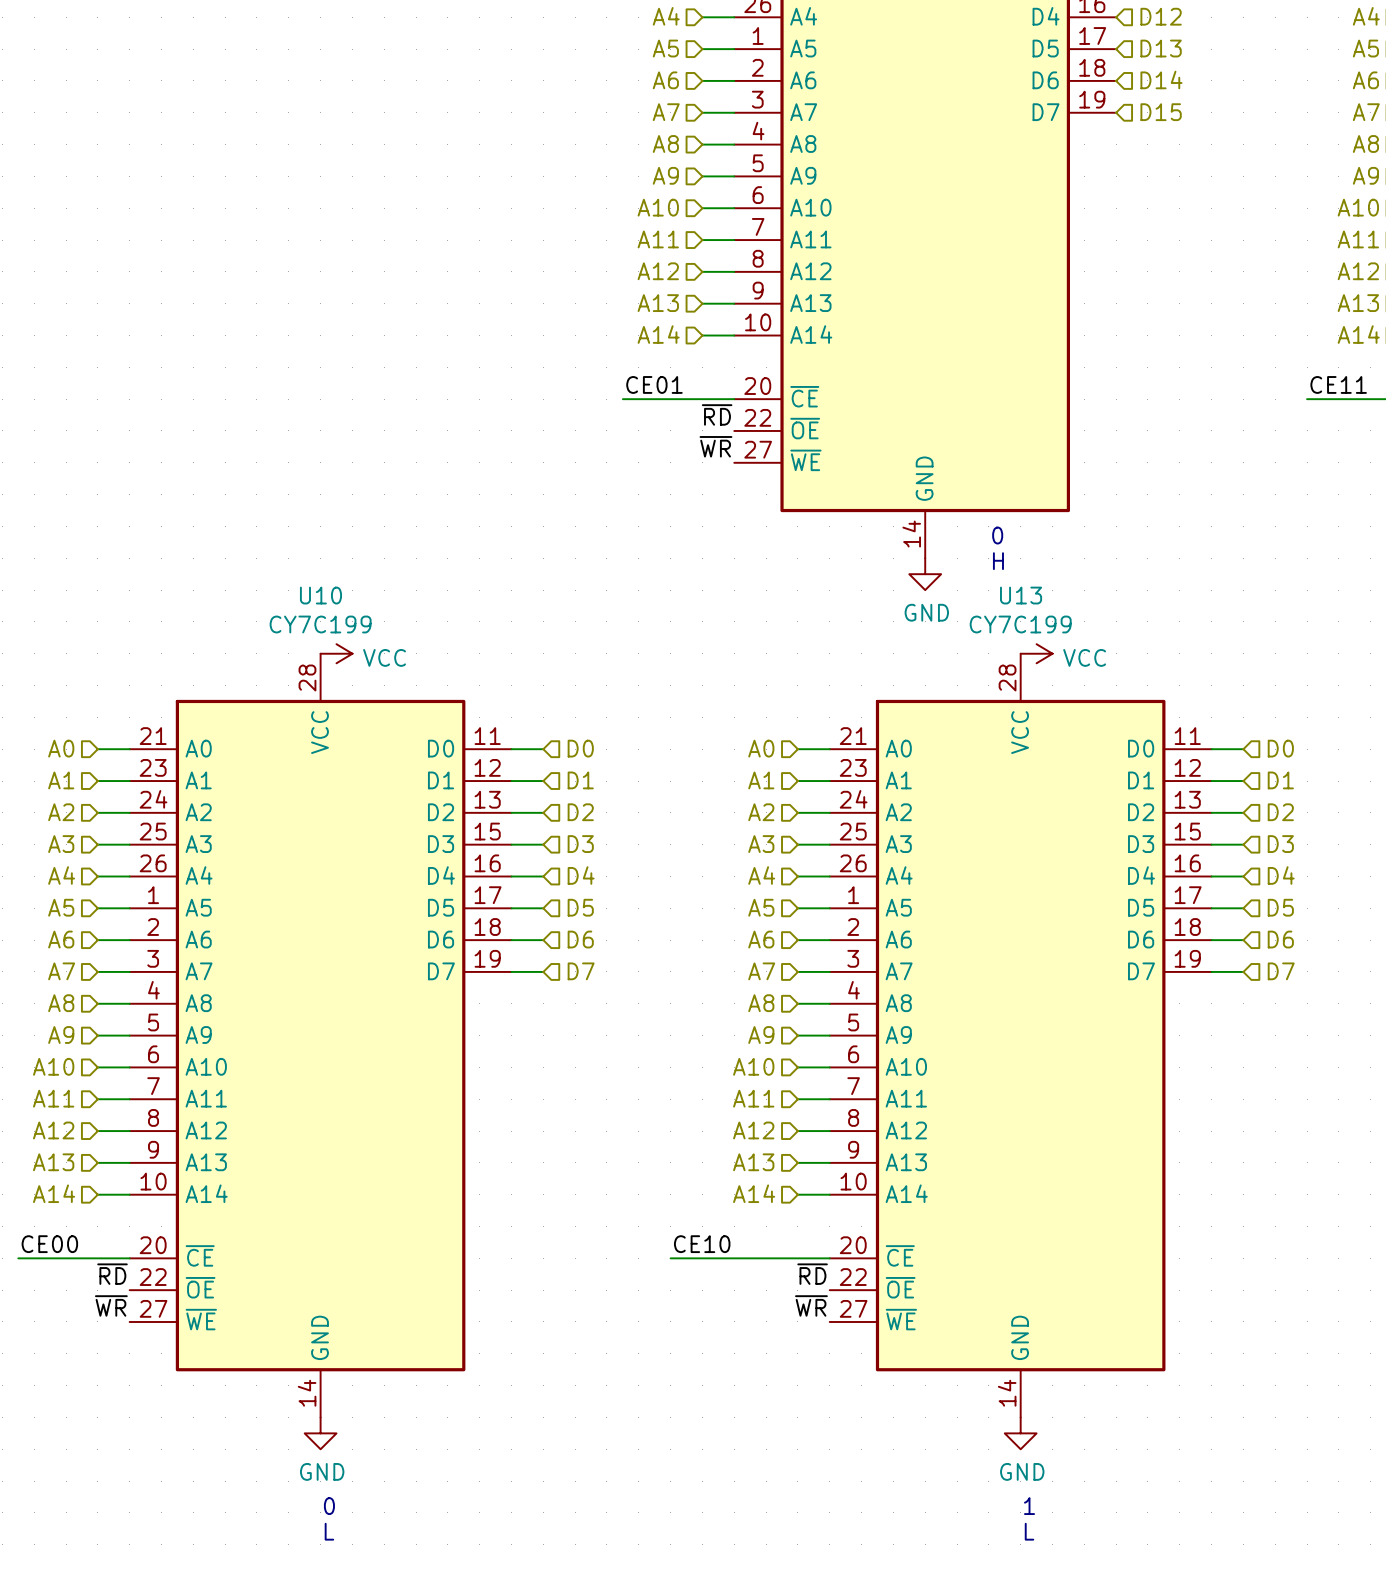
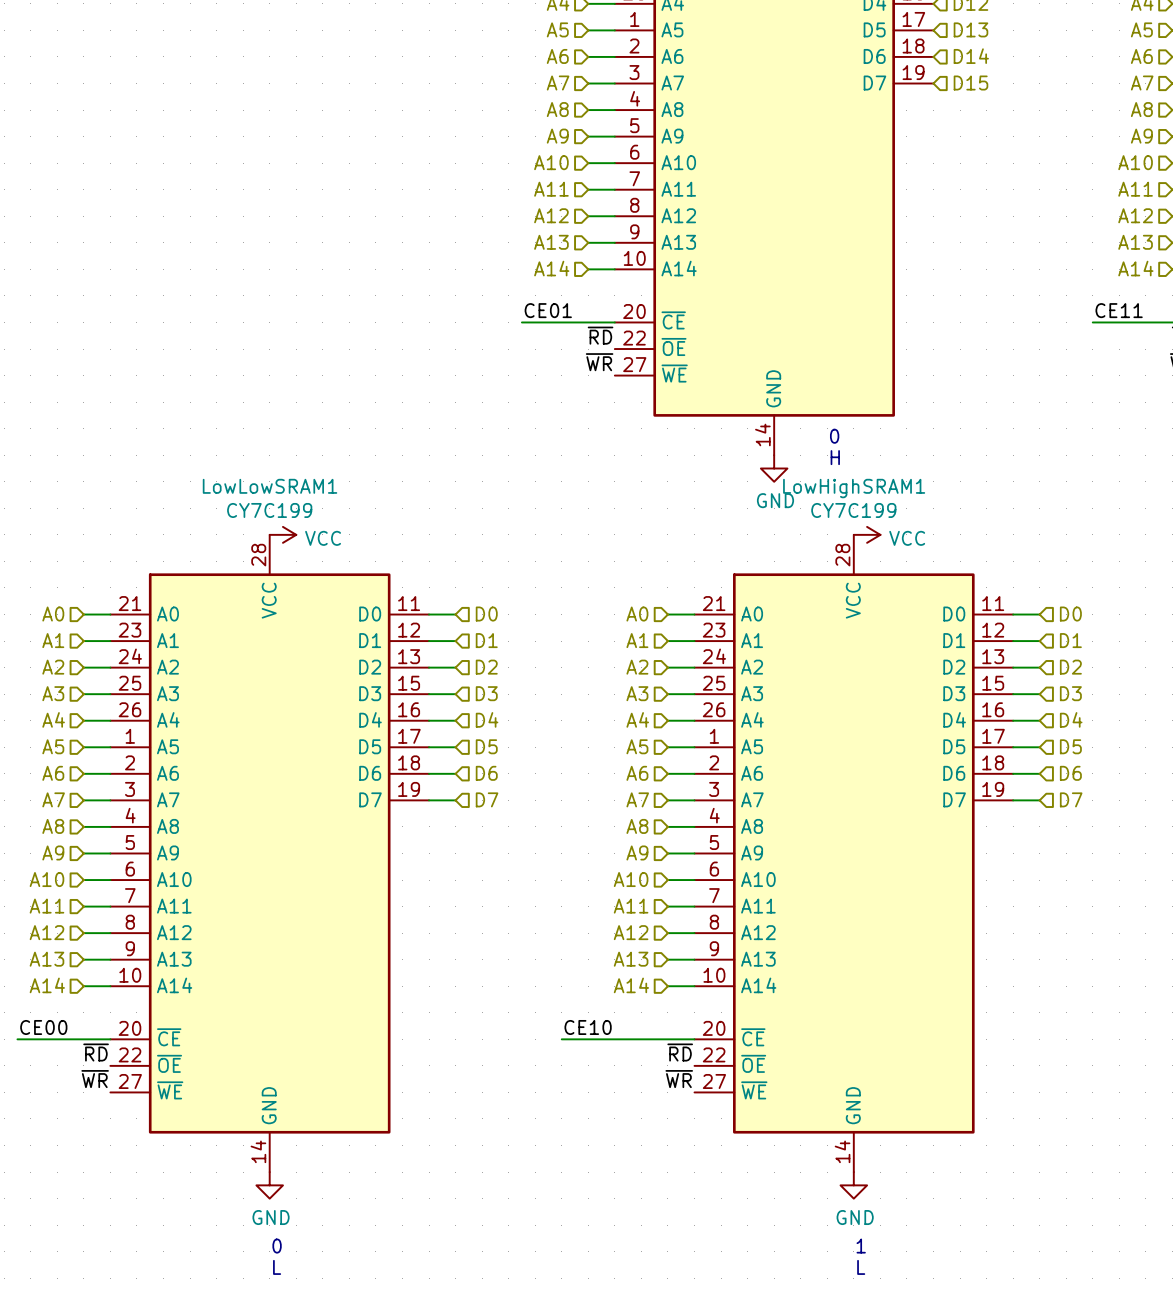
U10 name: U10 (320, 595) -> LowLowSRAM1 (270, 486)
U13 name: U13 (1021, 595) -> LowHighSRAM1 (854, 488)

